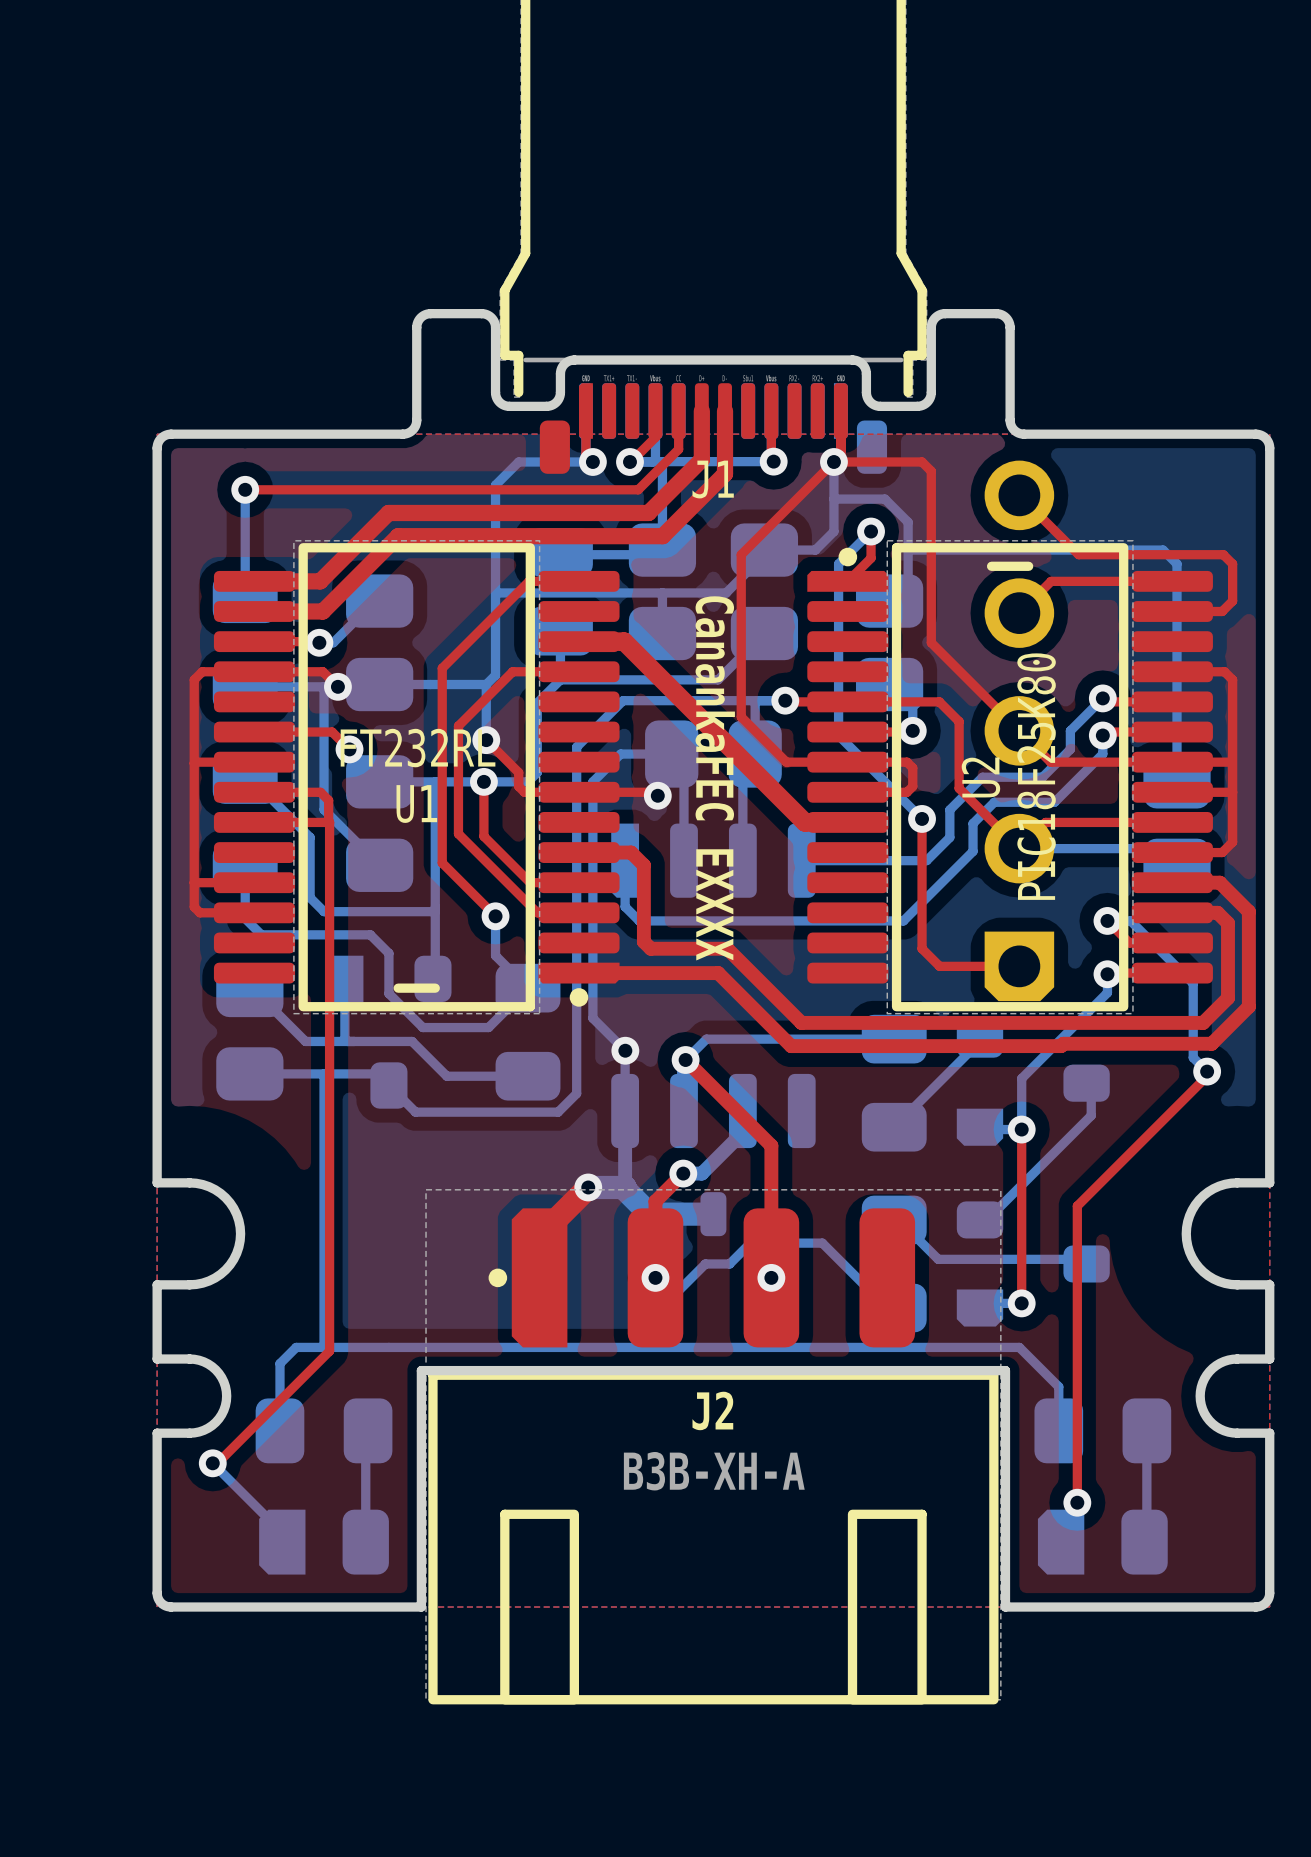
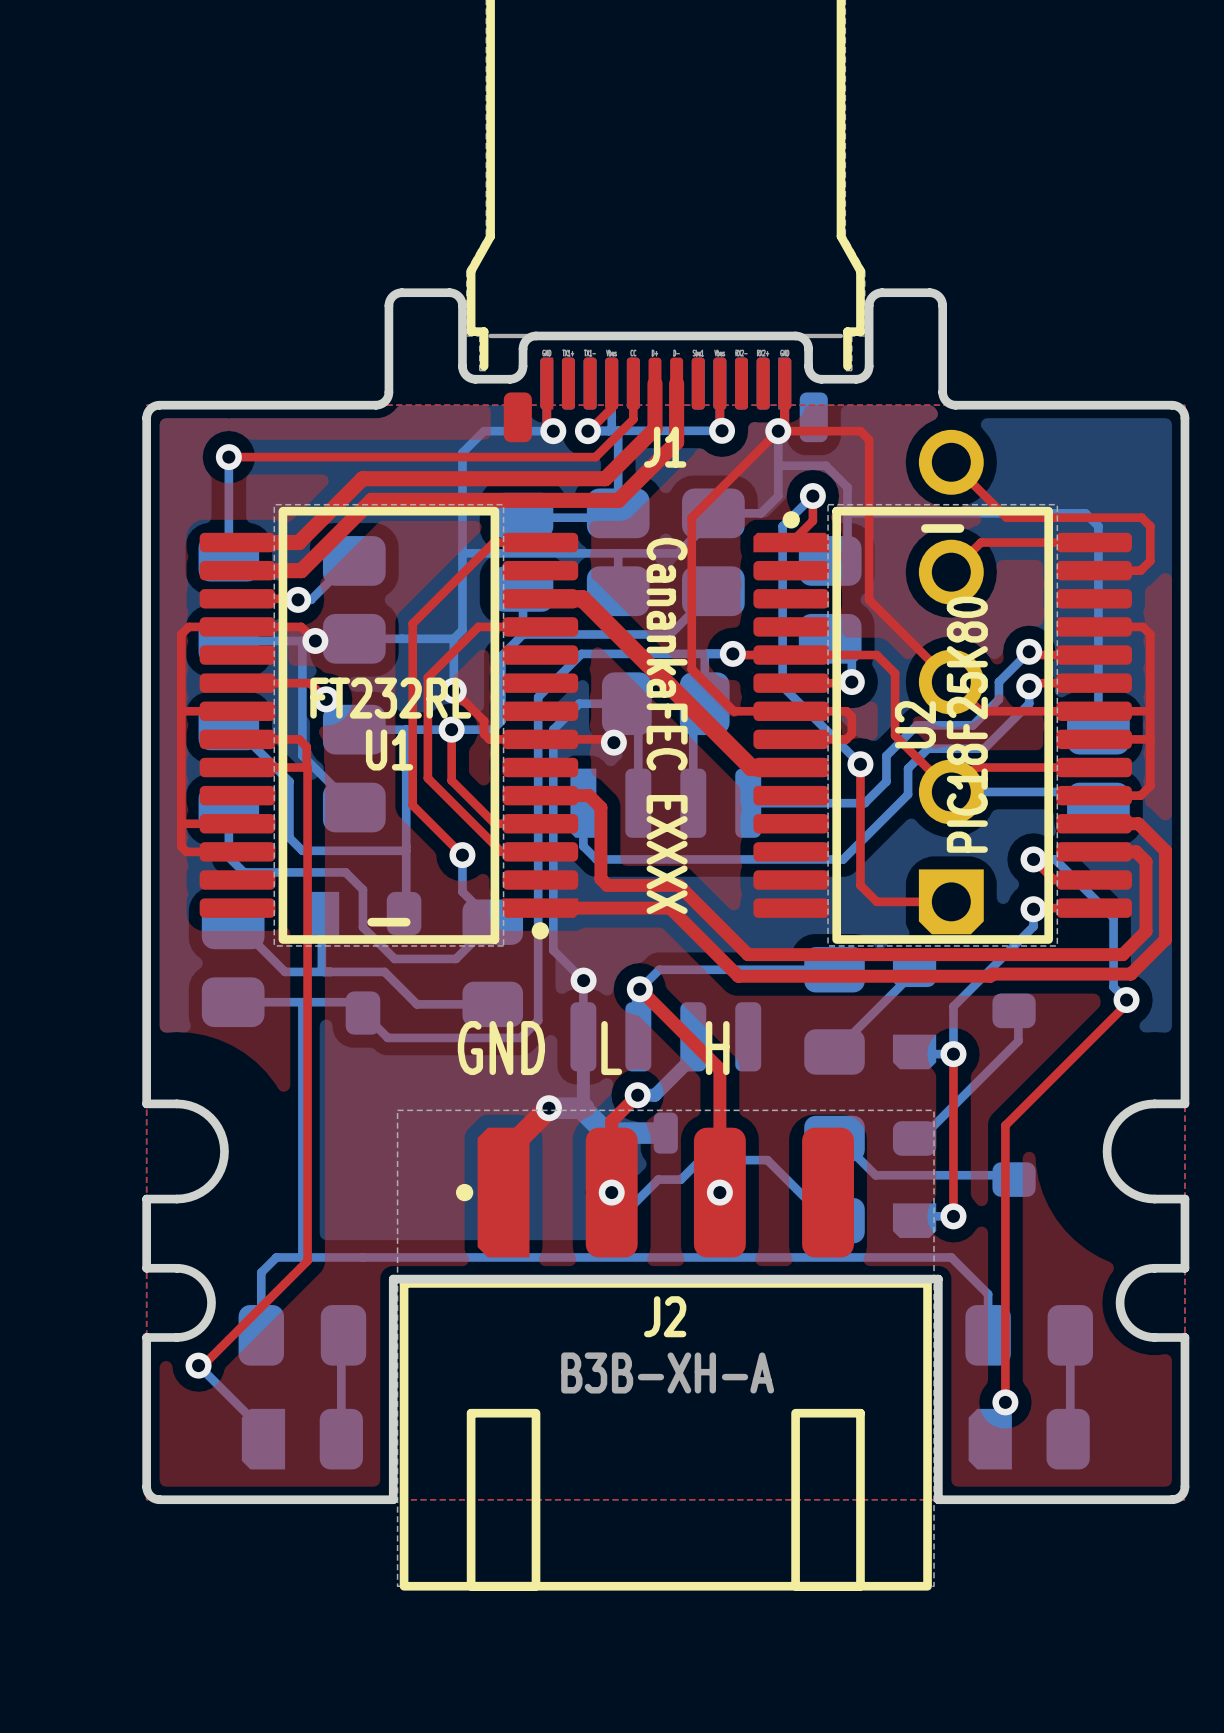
text: none -> GND (501, 1048)
text: none -> L (611, 1048)
text: none -> H (717, 1048)

